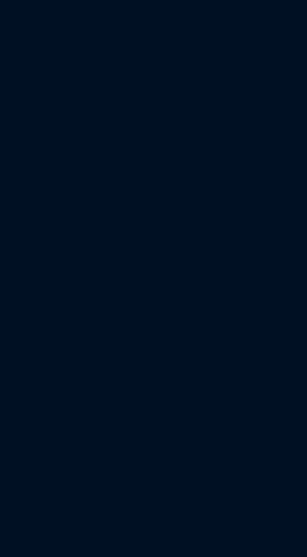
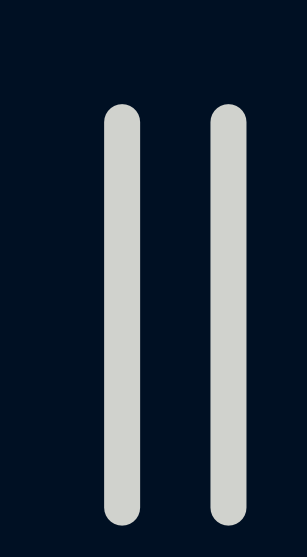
board edge: none -> (122, 122) (122, 507)
board edge: none -> (228, 122) (228, 507)

